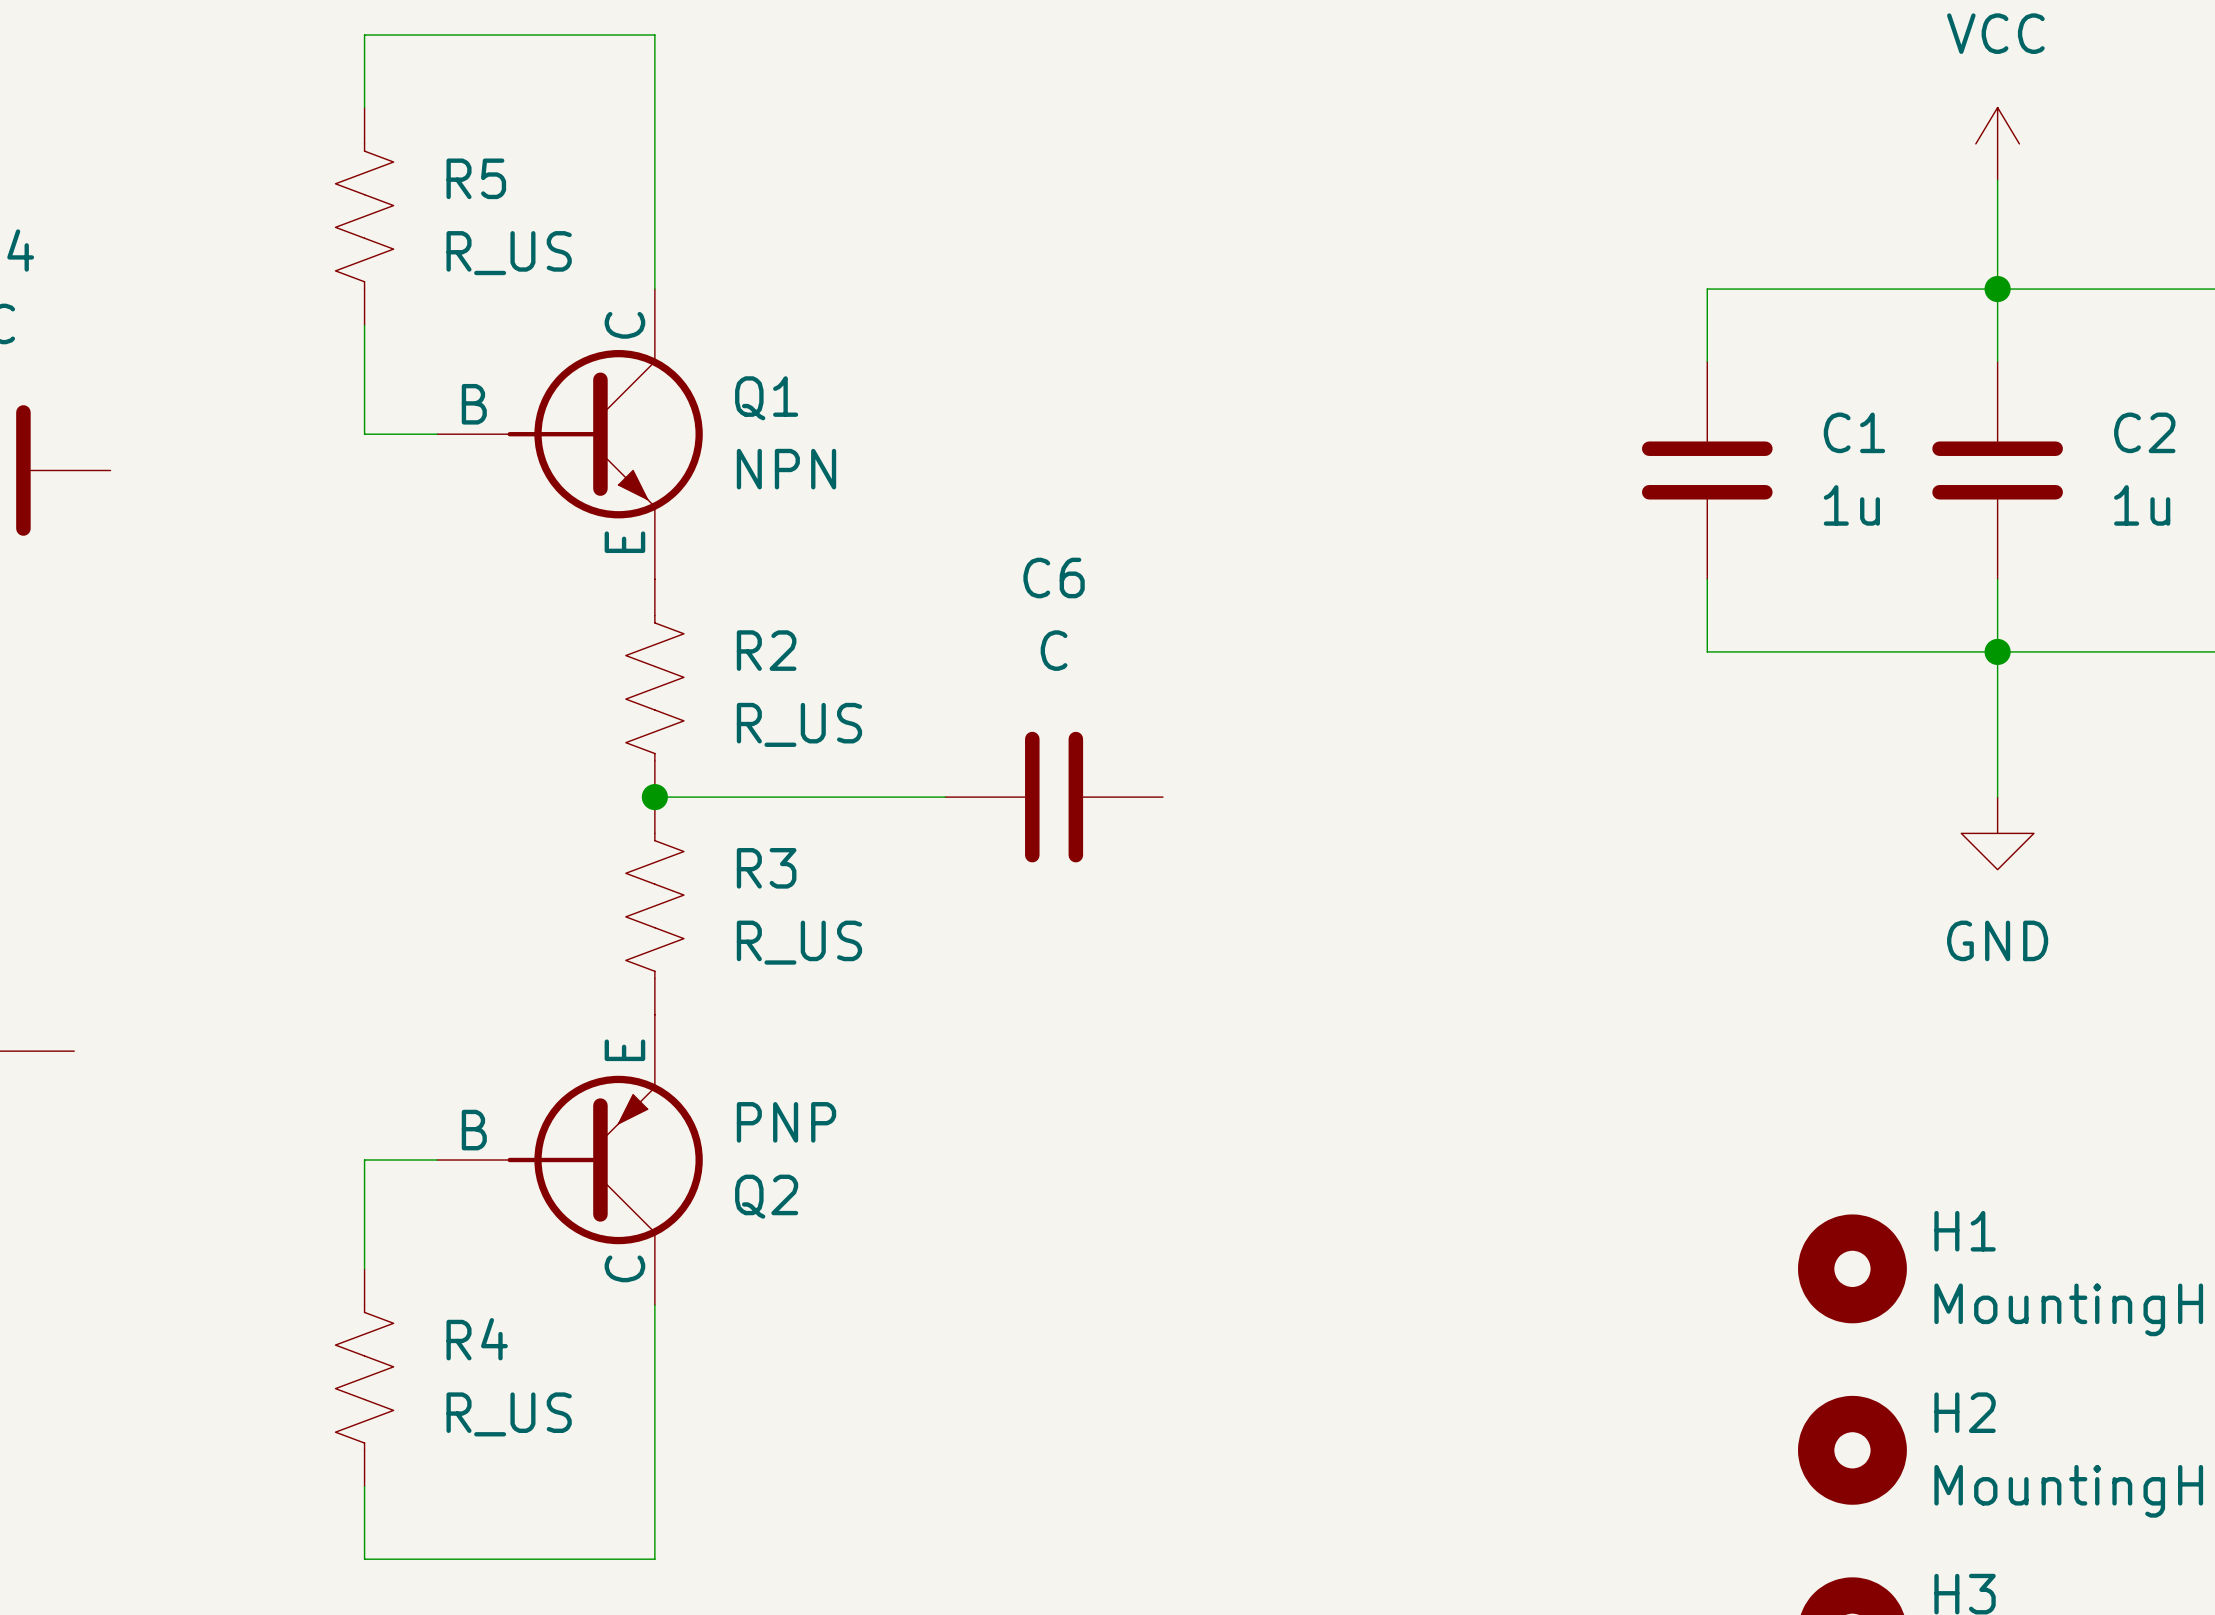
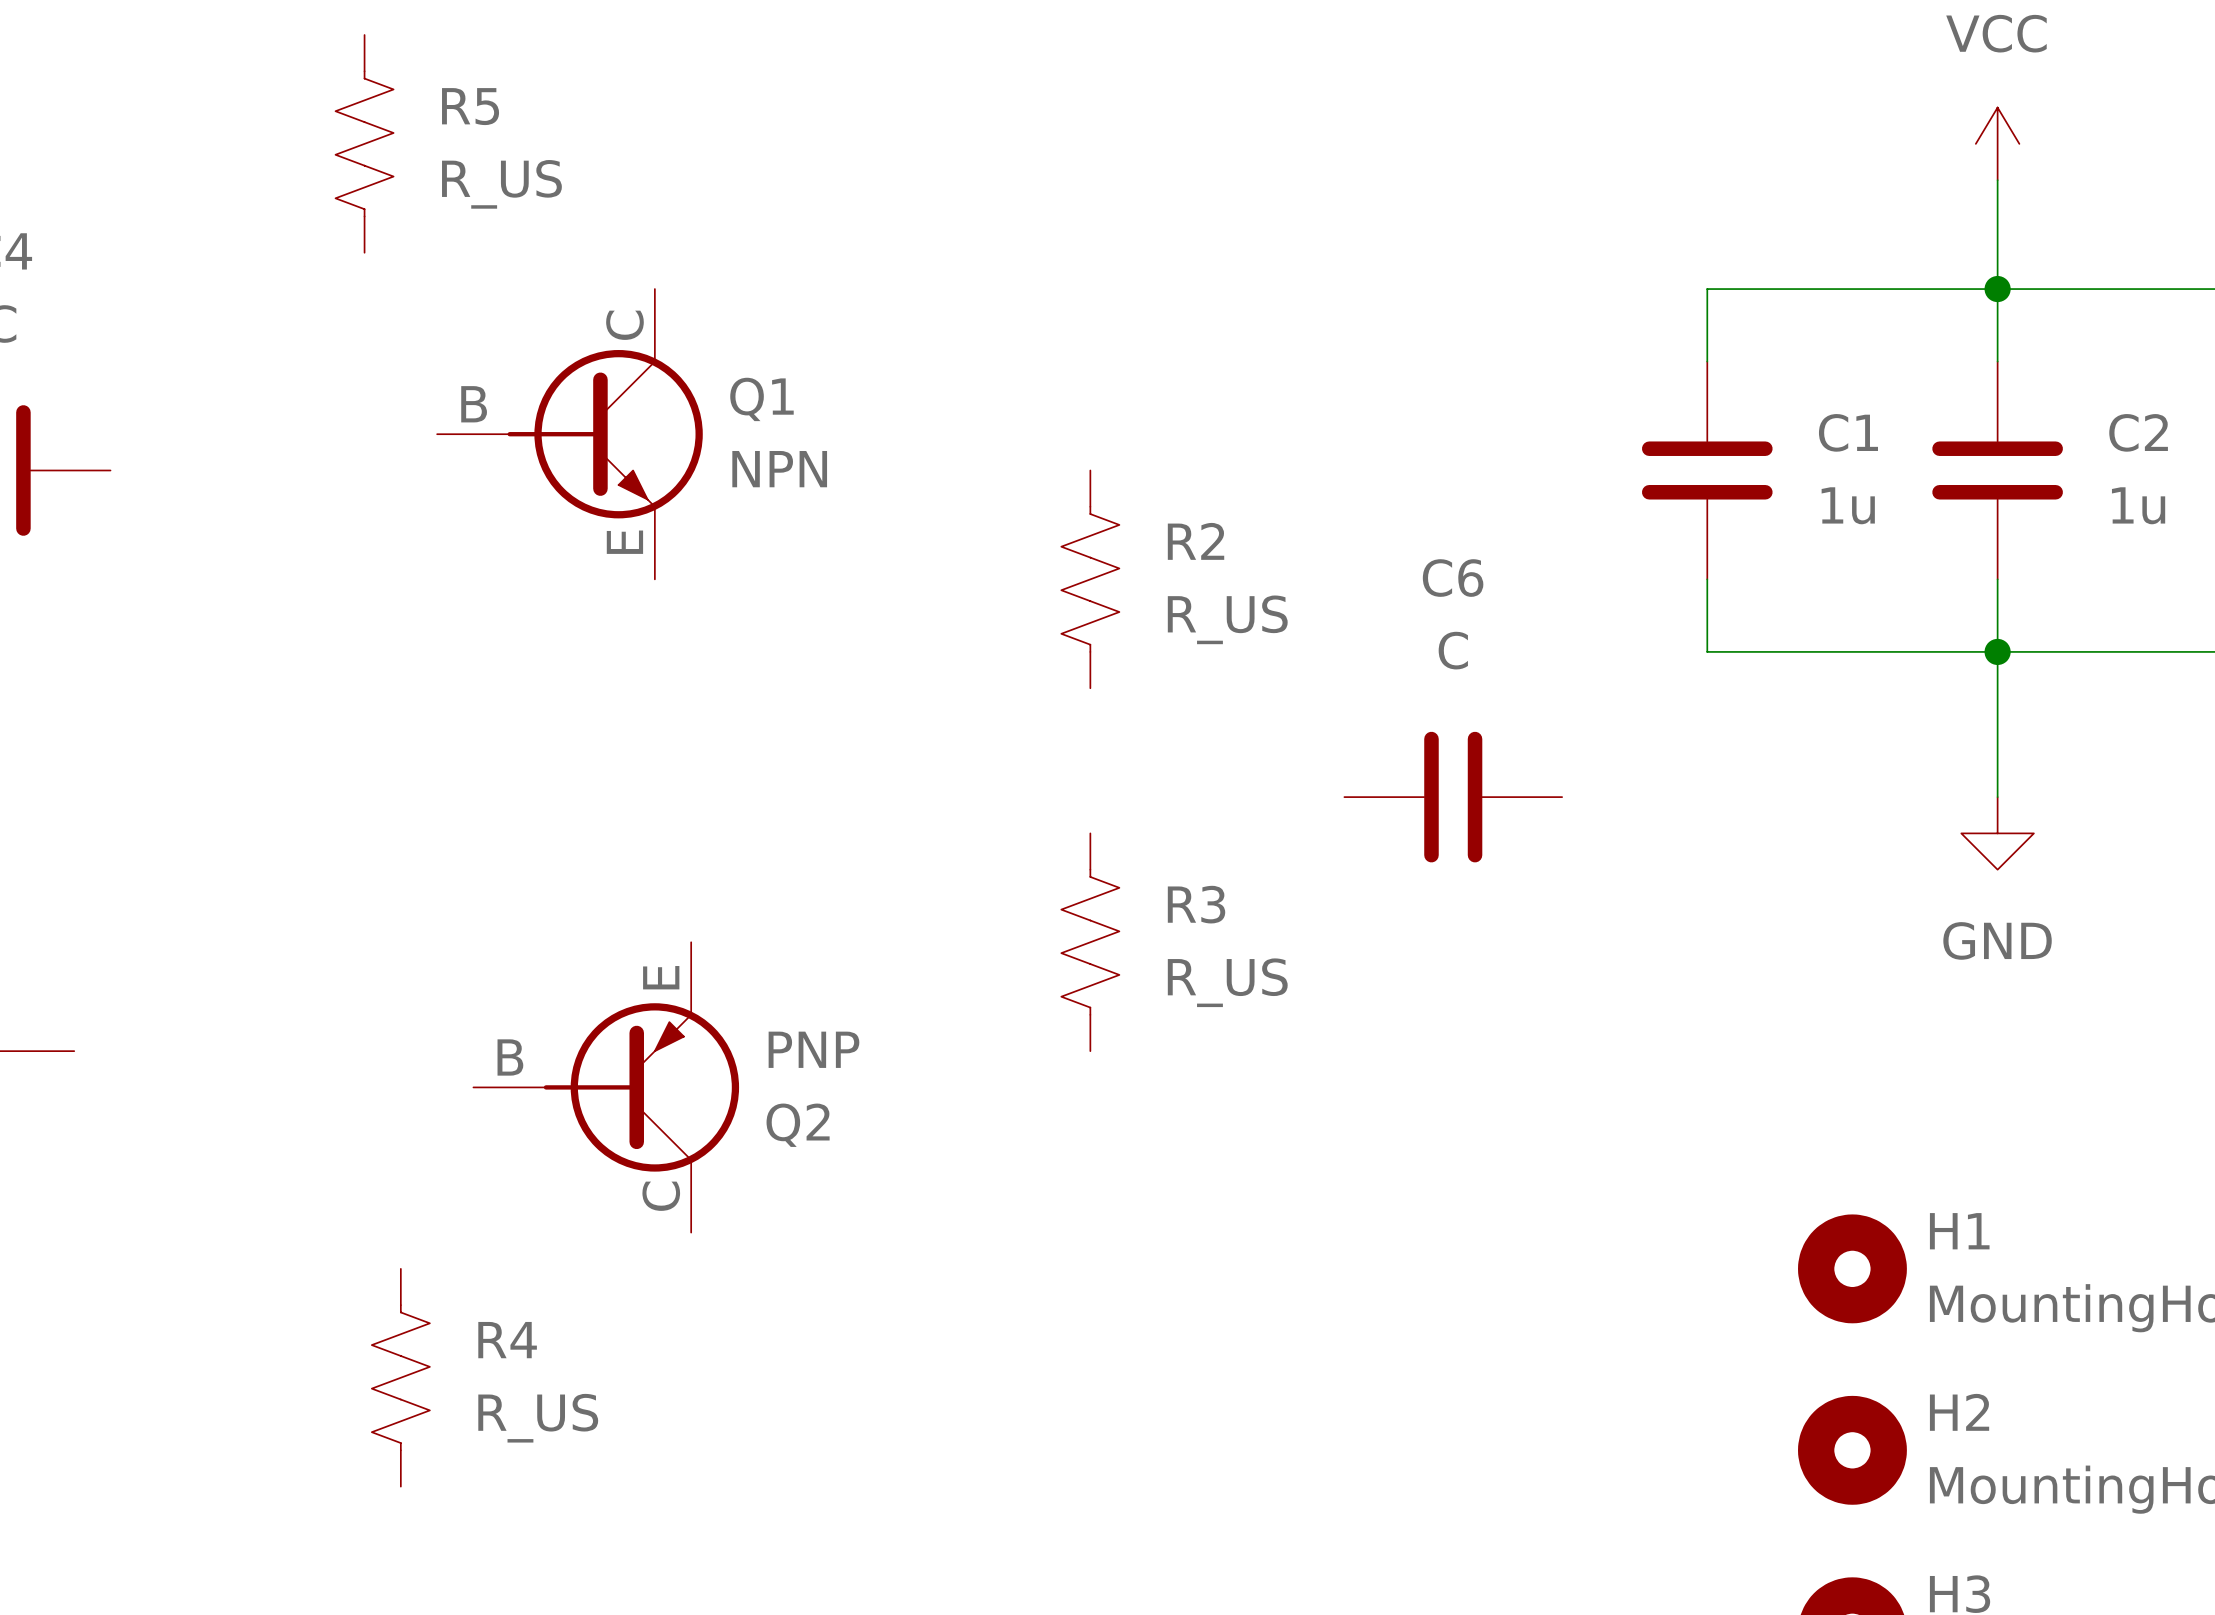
wire: (364, 107) (364, 35) (654, 35) (654, 289) -> none
R5 position: (364, 216) -> (364, 143)
wire: (364, 325) (364, 434) (437, 434) -> none
R2 position: (654, 688) -> (1090, 579)
wire: (654, 797) (945, 797) -> none
junction: (654, 797) -> none
C6 position: (1054, 797) -> (1453, 797)
R3 position: (654, 905) -> (1090, 942)
wire: (437, 1160) (364, 1160) (364, 1268) -> none
Q2 position: (569, 1160) -> (606, 1087)
wire: (654, 1305) (654, 1559) (364, 1559) (364, 1486) -> none
R4 position: (364, 1377) -> (400, 1377)

